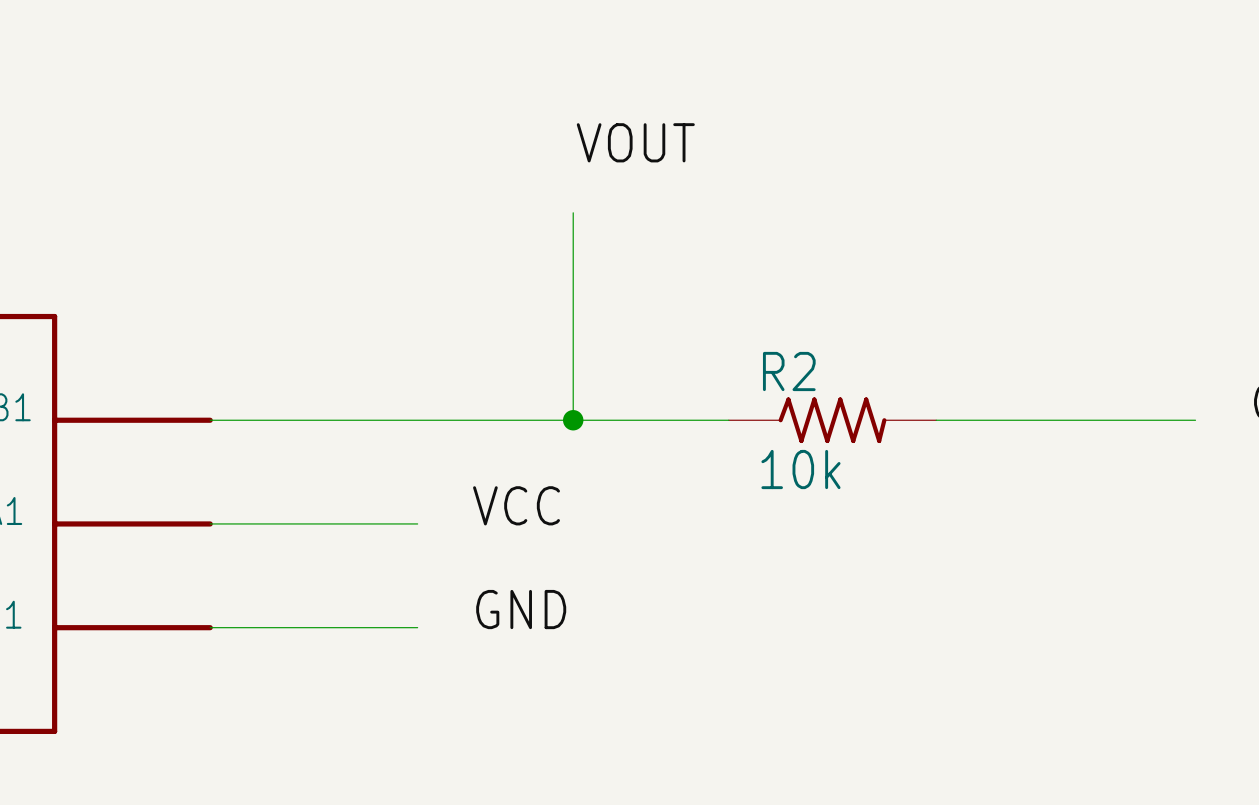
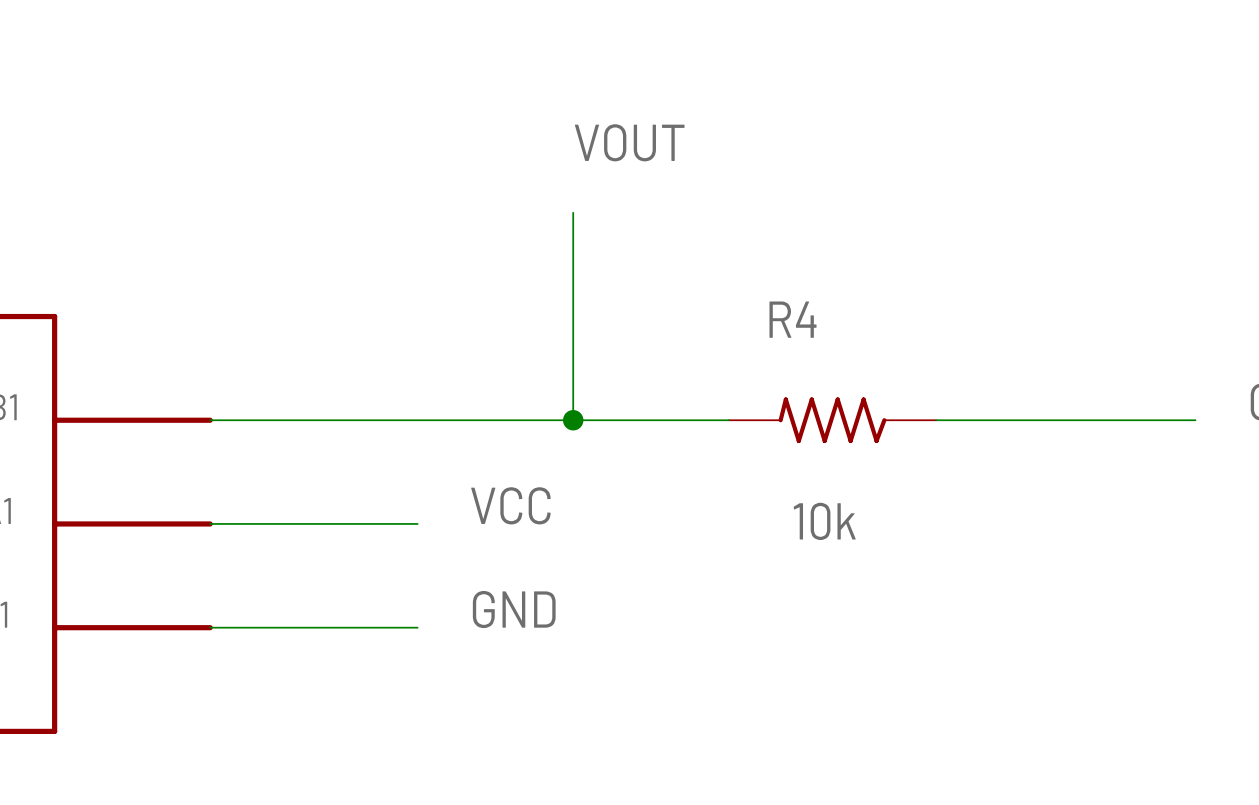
R2: 10k (832, 420) -> none
R4: none -> 10k (832, 420)

